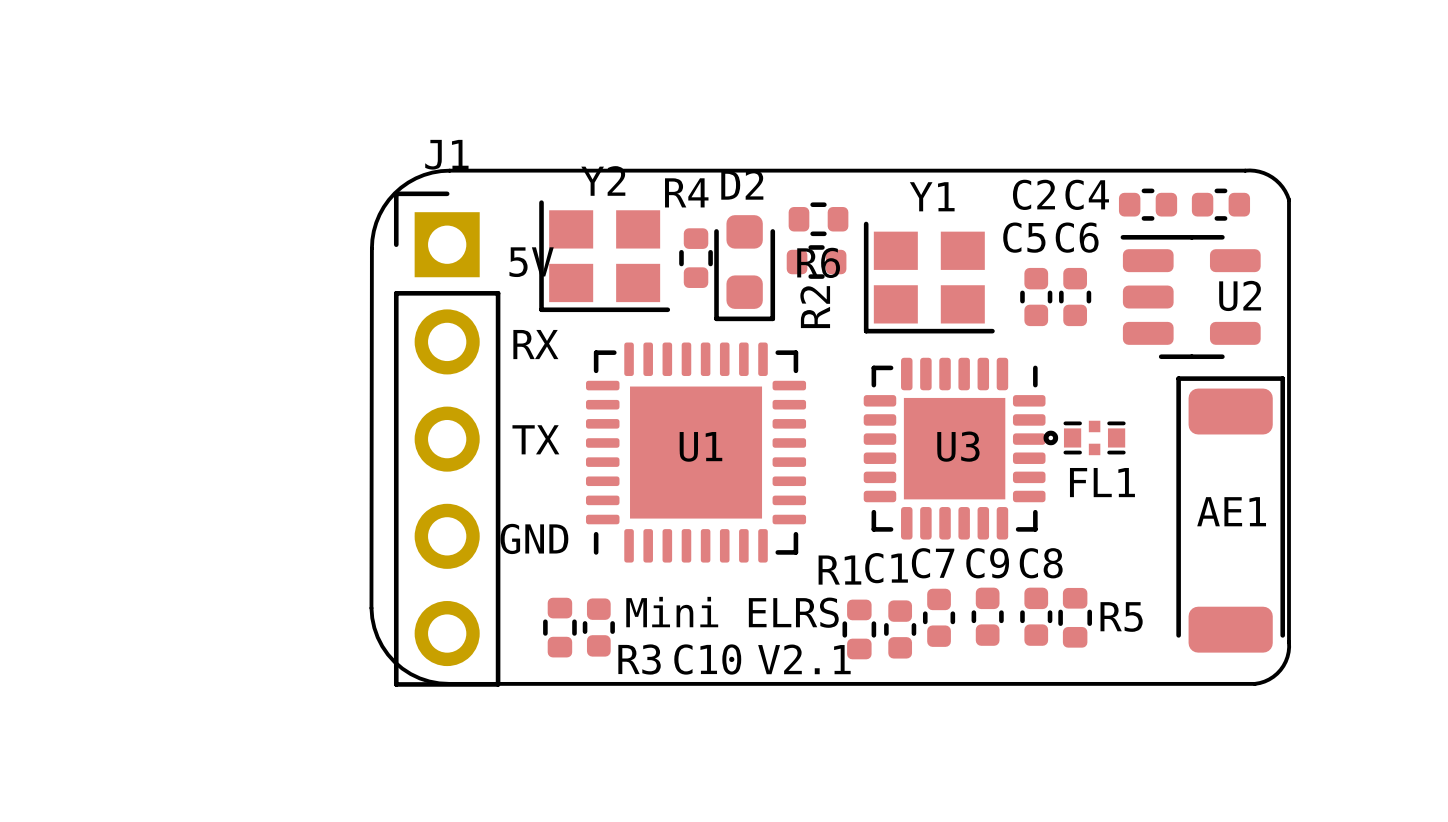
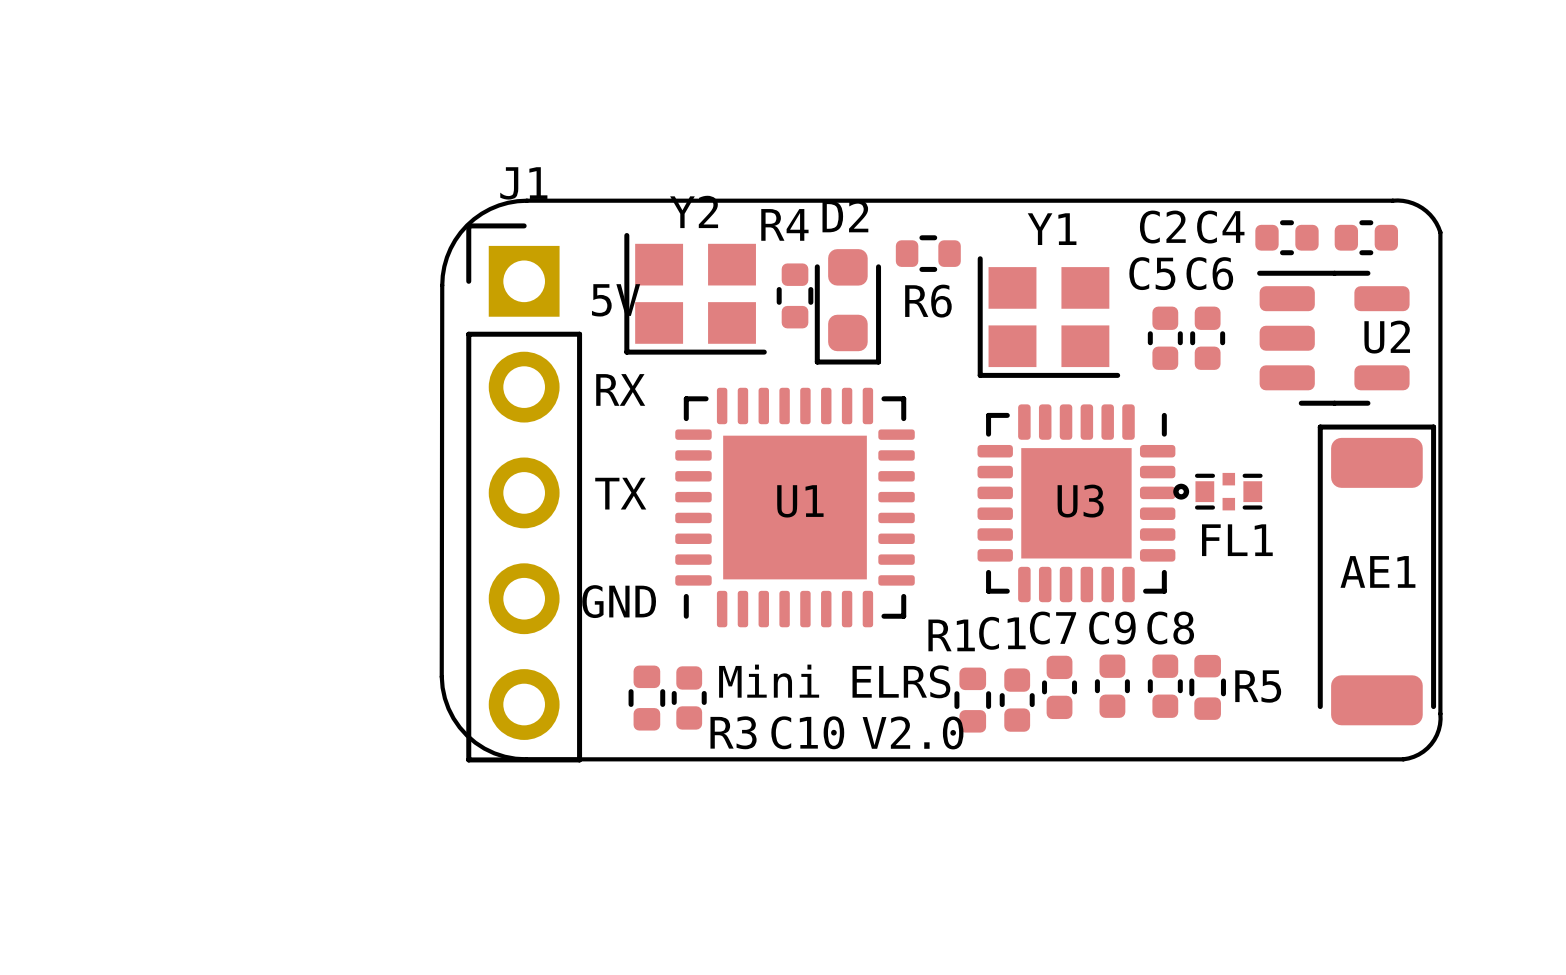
R2: (816, 262) -> none
text: V2.1 (804, 659) -> V2.0 (913, 732)

